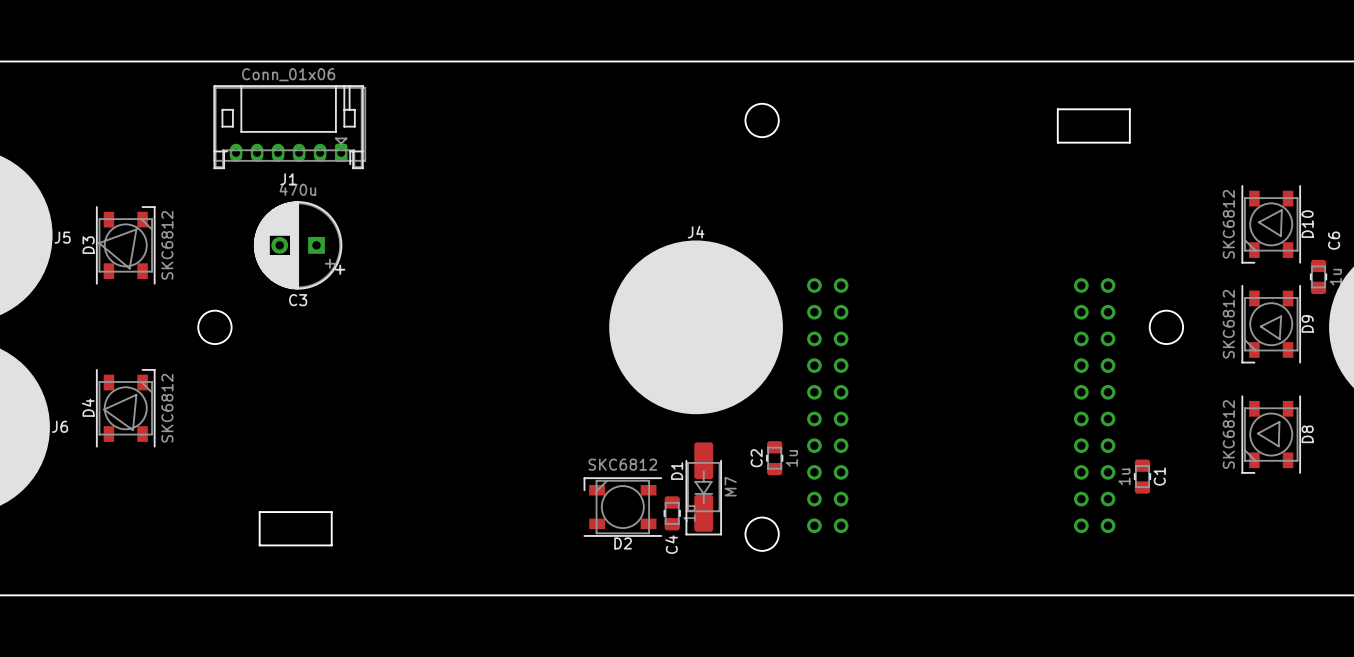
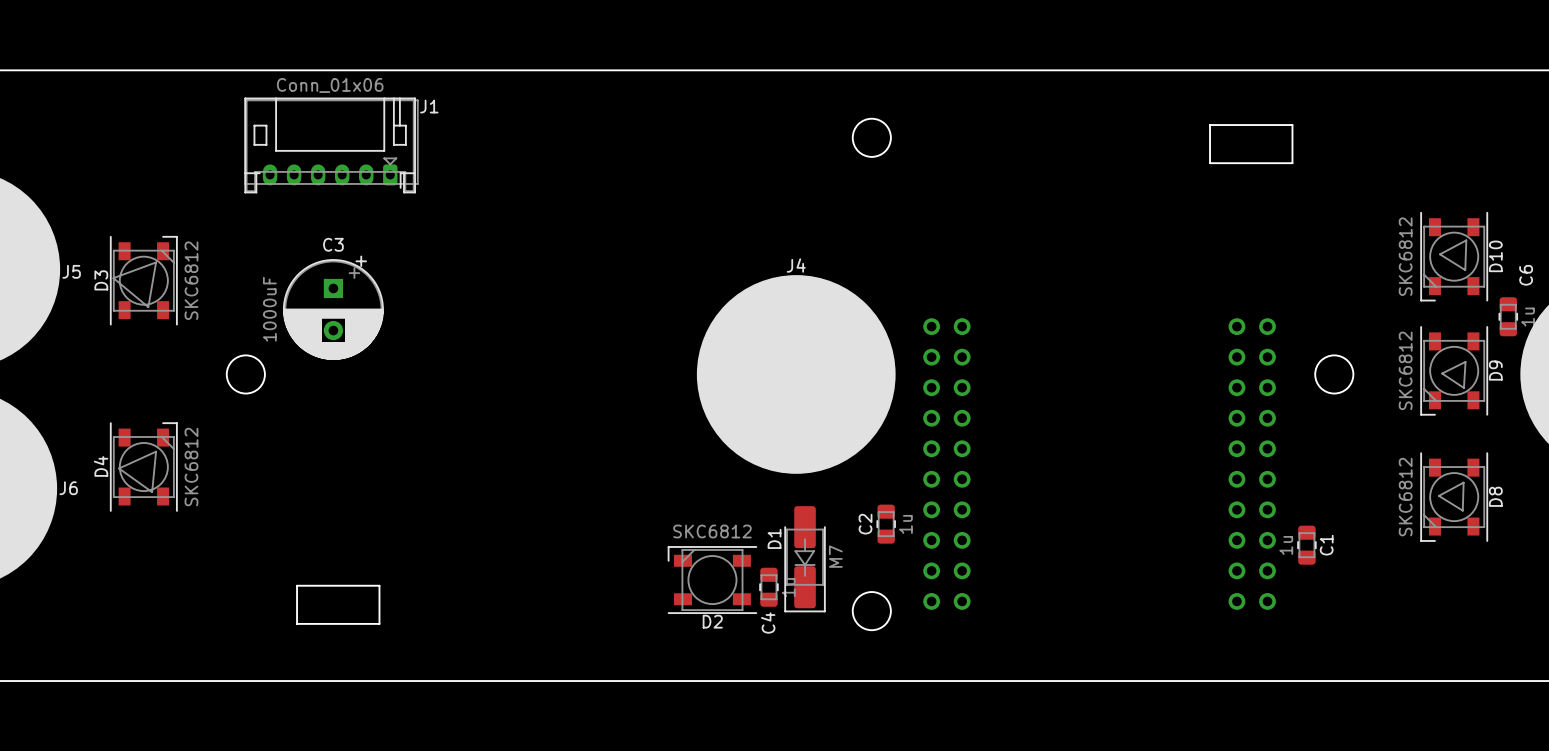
J1 name position: J1 (288, 179) -> J1 (429, 106)
C3 value: 470u (297, 189) -> 1000uF (269, 309)
C3 rotation: 0° (299, 245) -> 90° counterclockwise (333, 307)
C3 name position: C3 (298, 300) -> C3 (333, 244)

